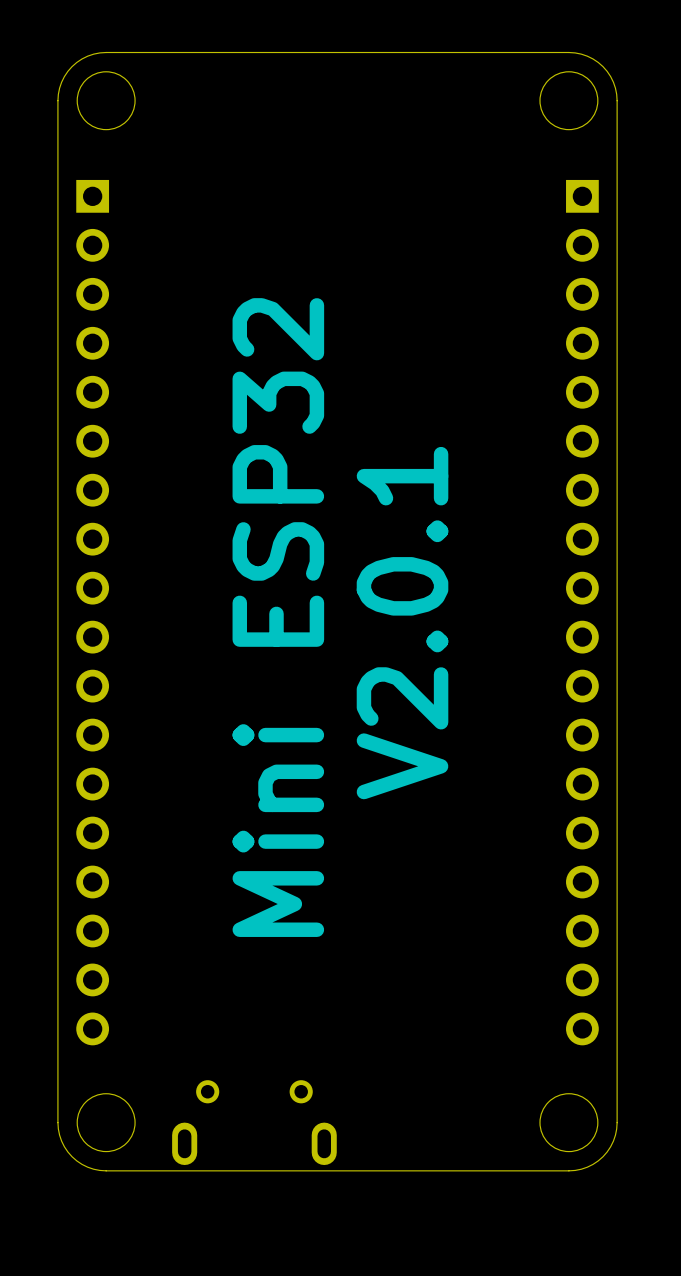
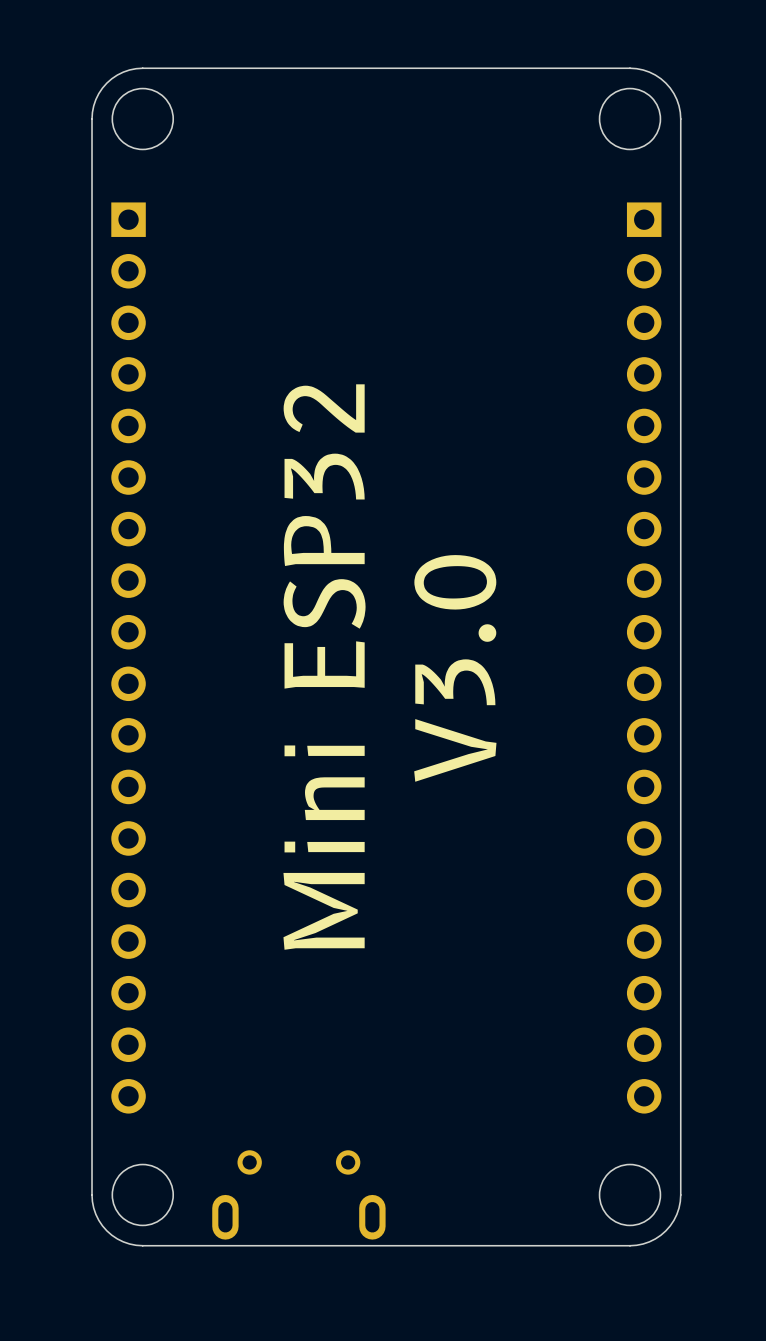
text: V2.0.1 (402, 623) -> V3.0 (455, 668)

